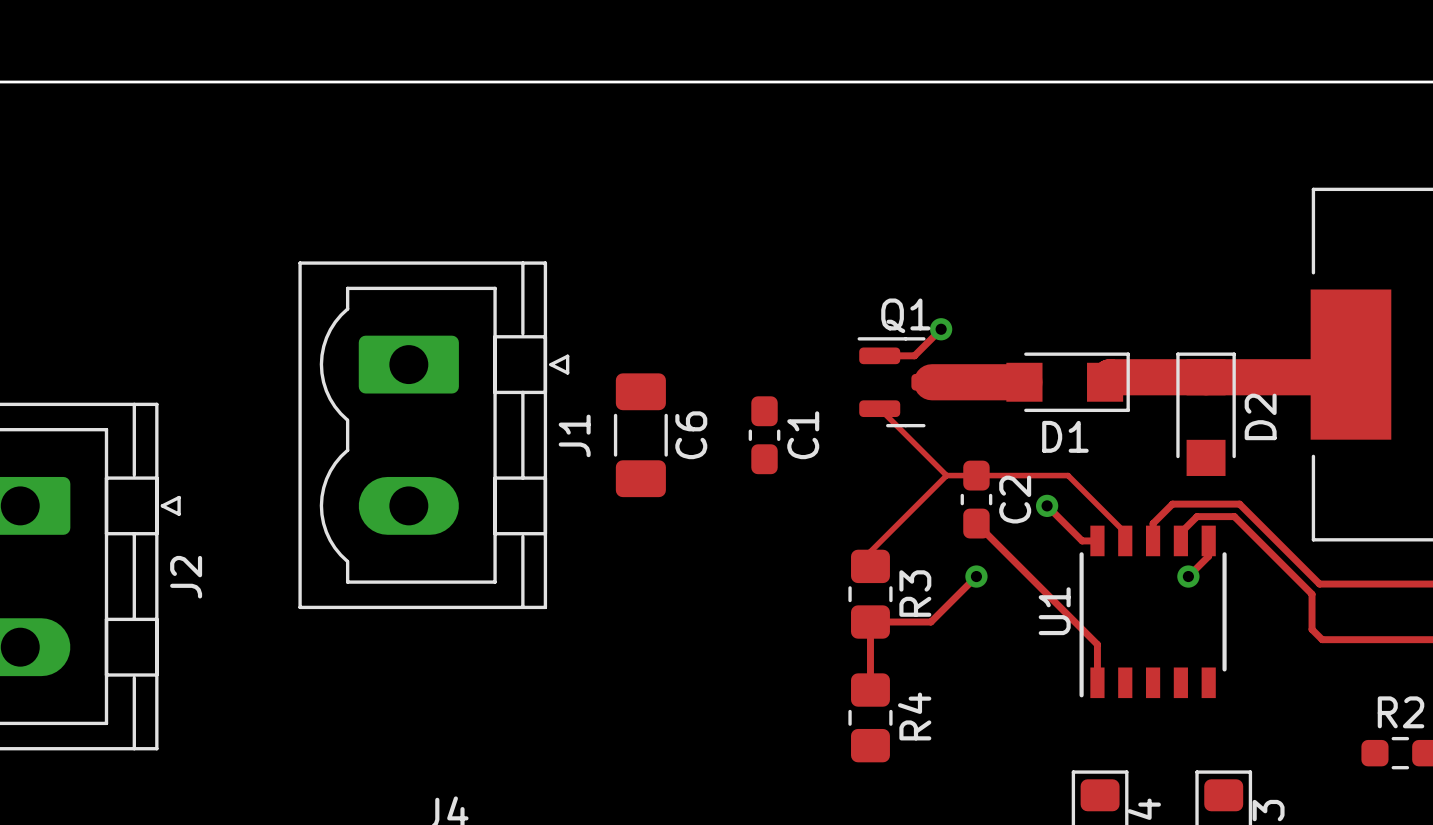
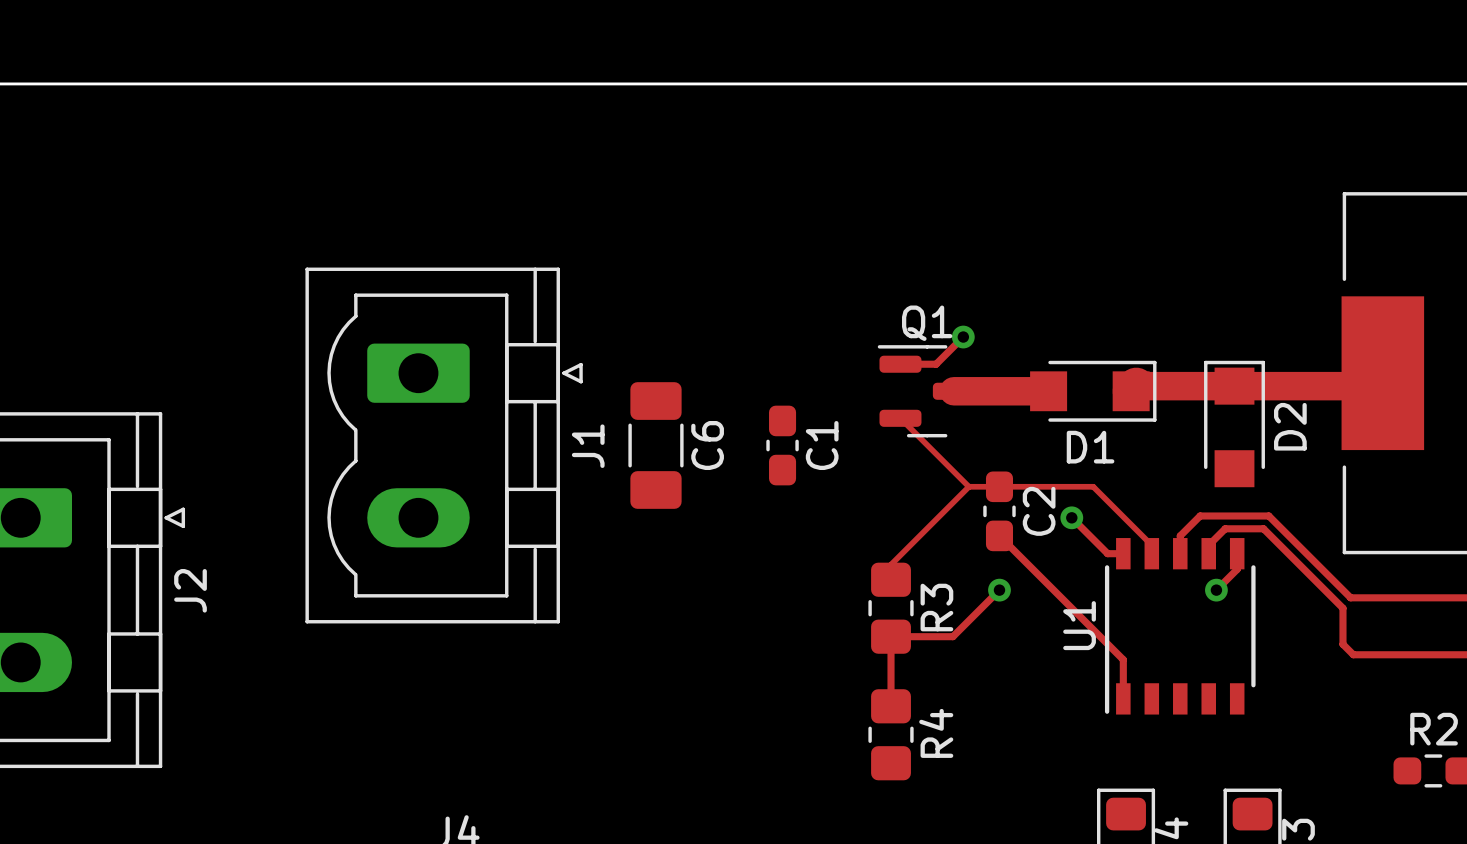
track width: thick (1110, 377) (1338, 377) -> thin (1136, 386) (1369, 386)
track width: thick (931, 382) (1024, 382) -> thin (953, 391) (1048, 391)

